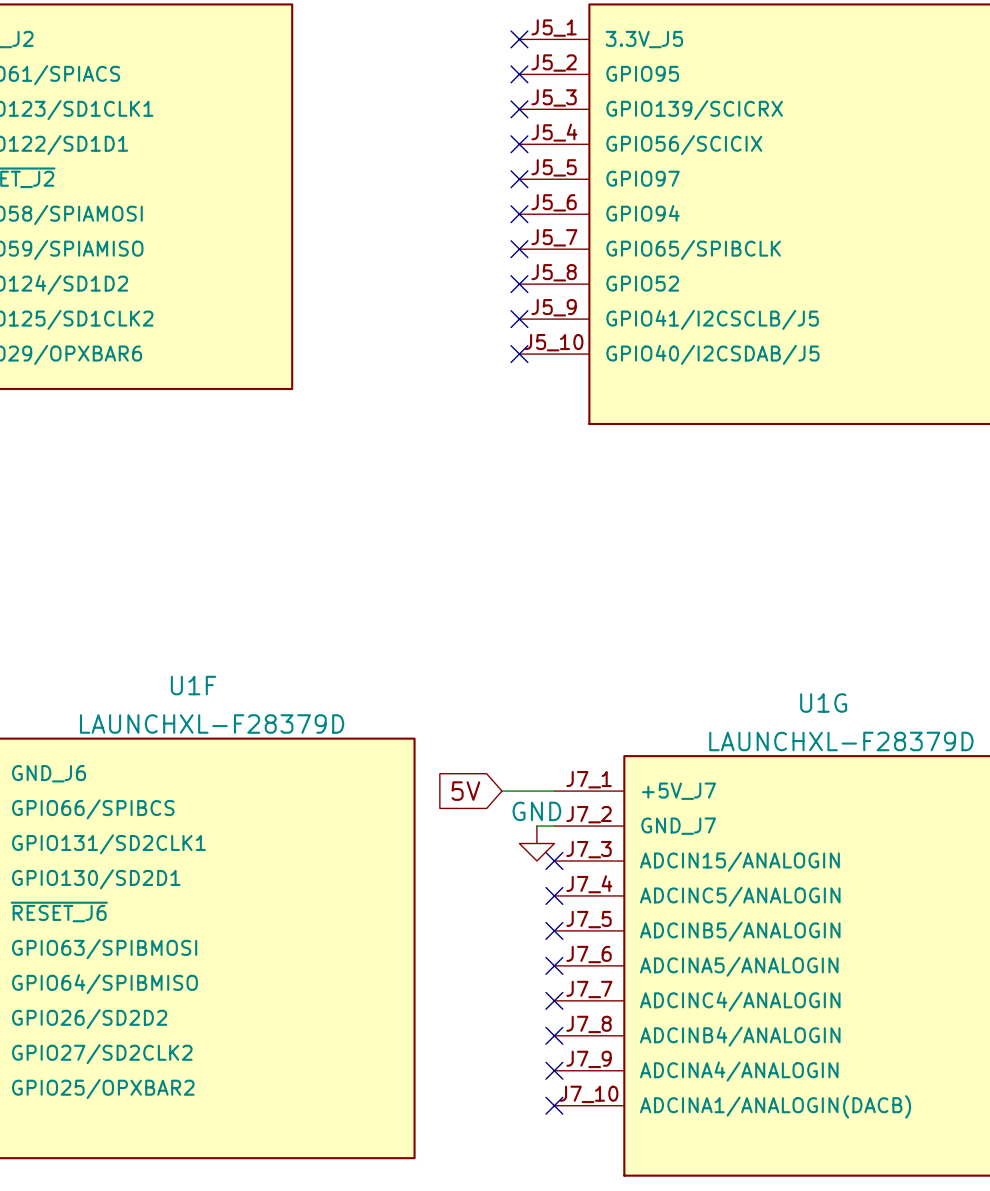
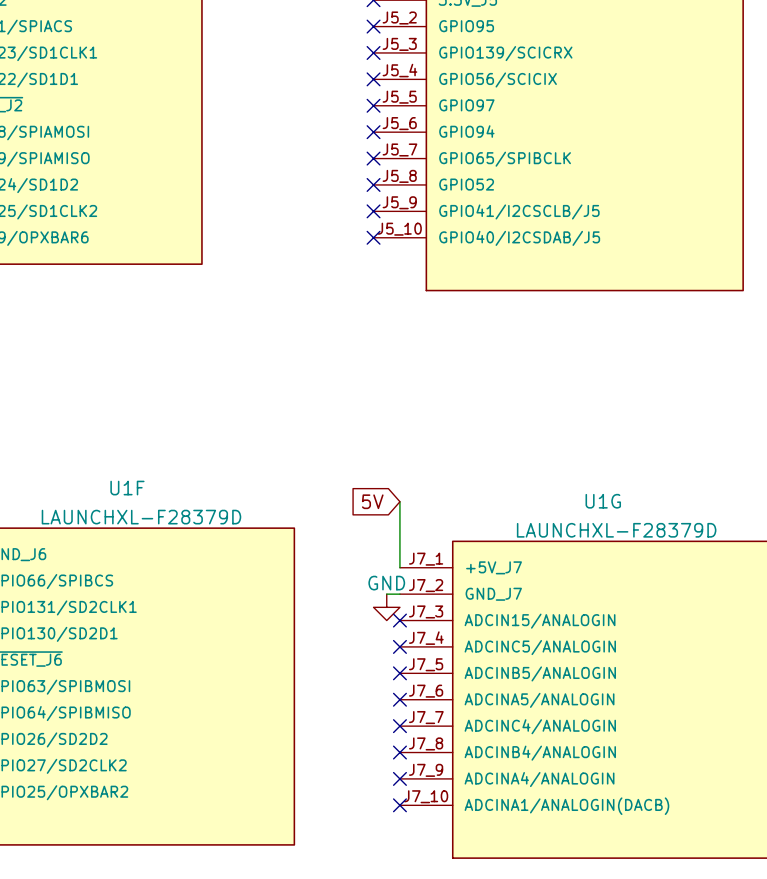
global label position: 5V (465, 791) -> 5V (372, 501)
wire: (501, 791) (554, 791) -> (399, 501) (399, 567)

